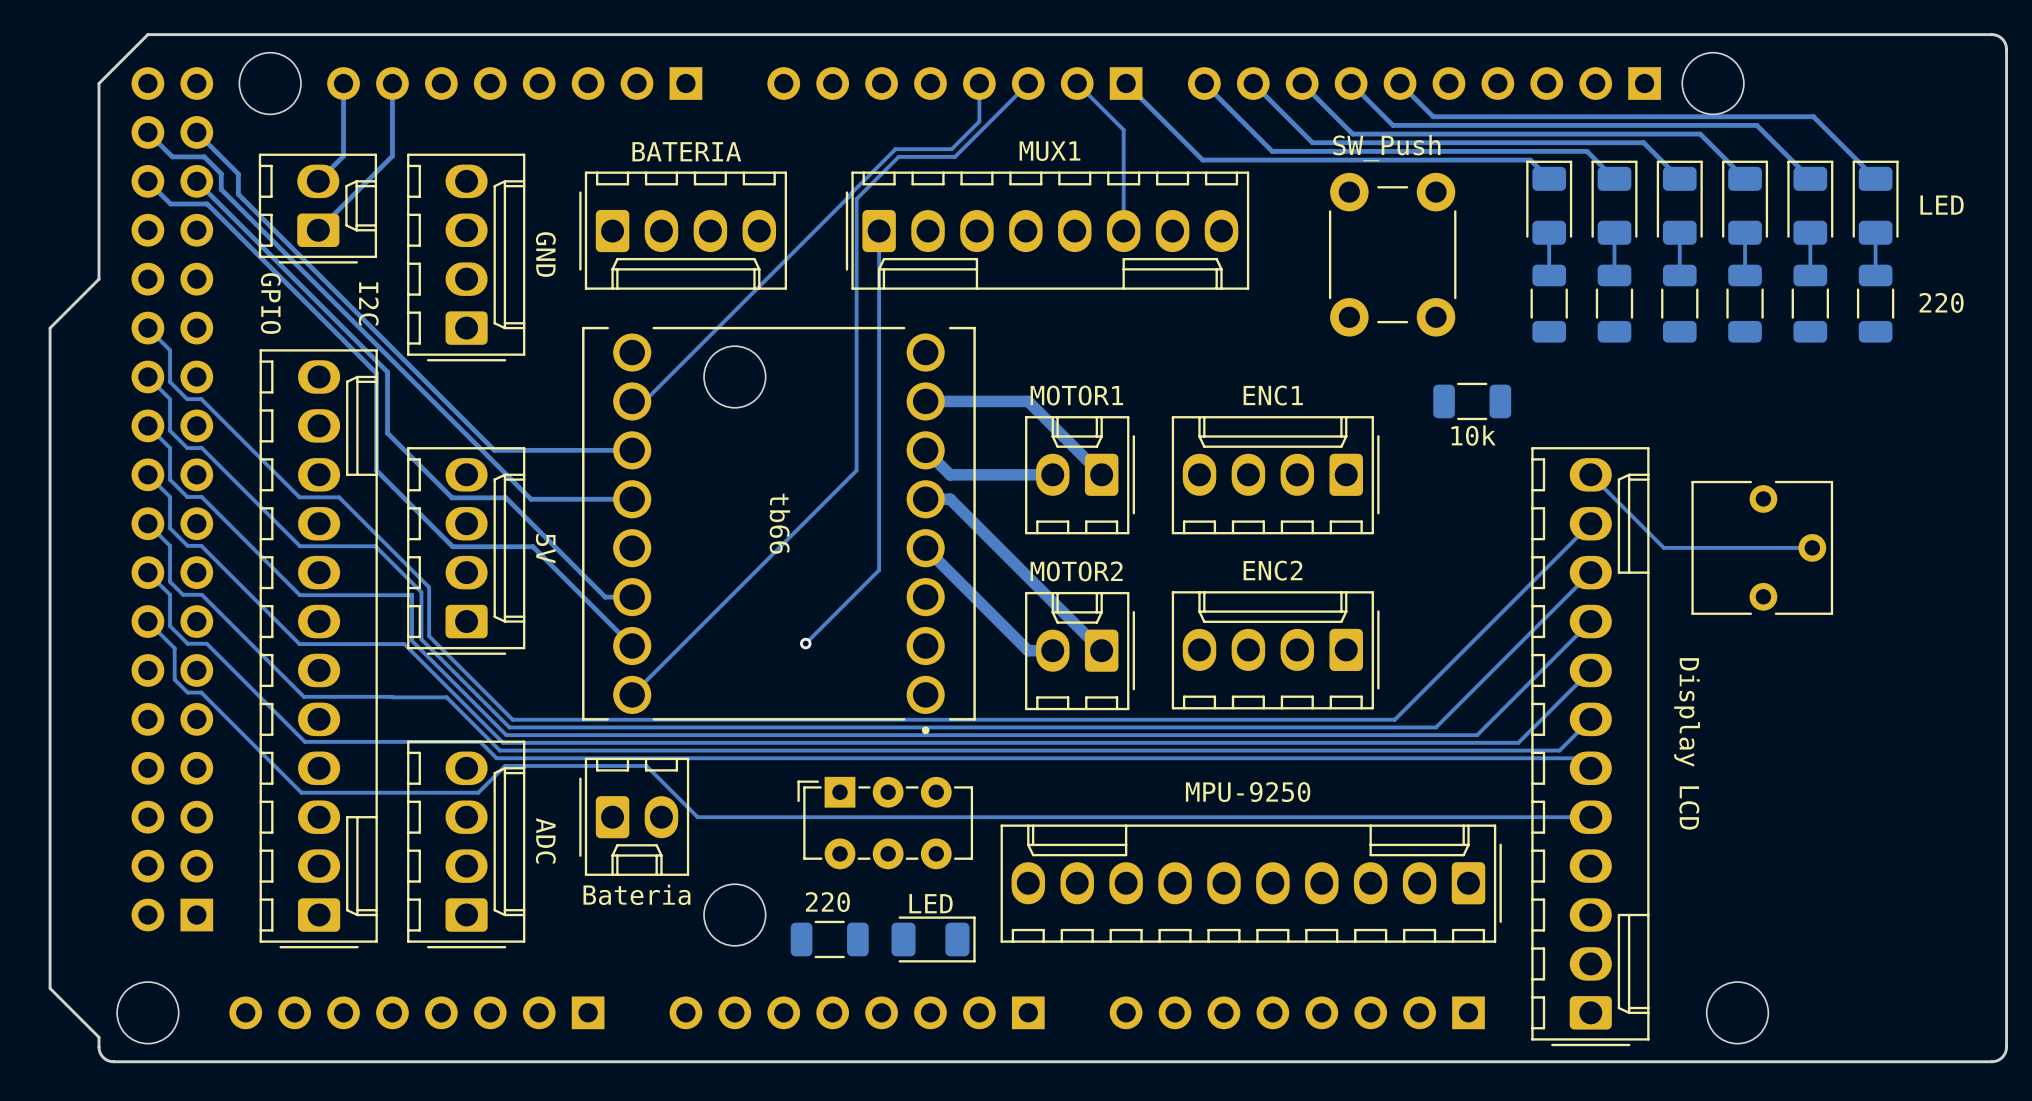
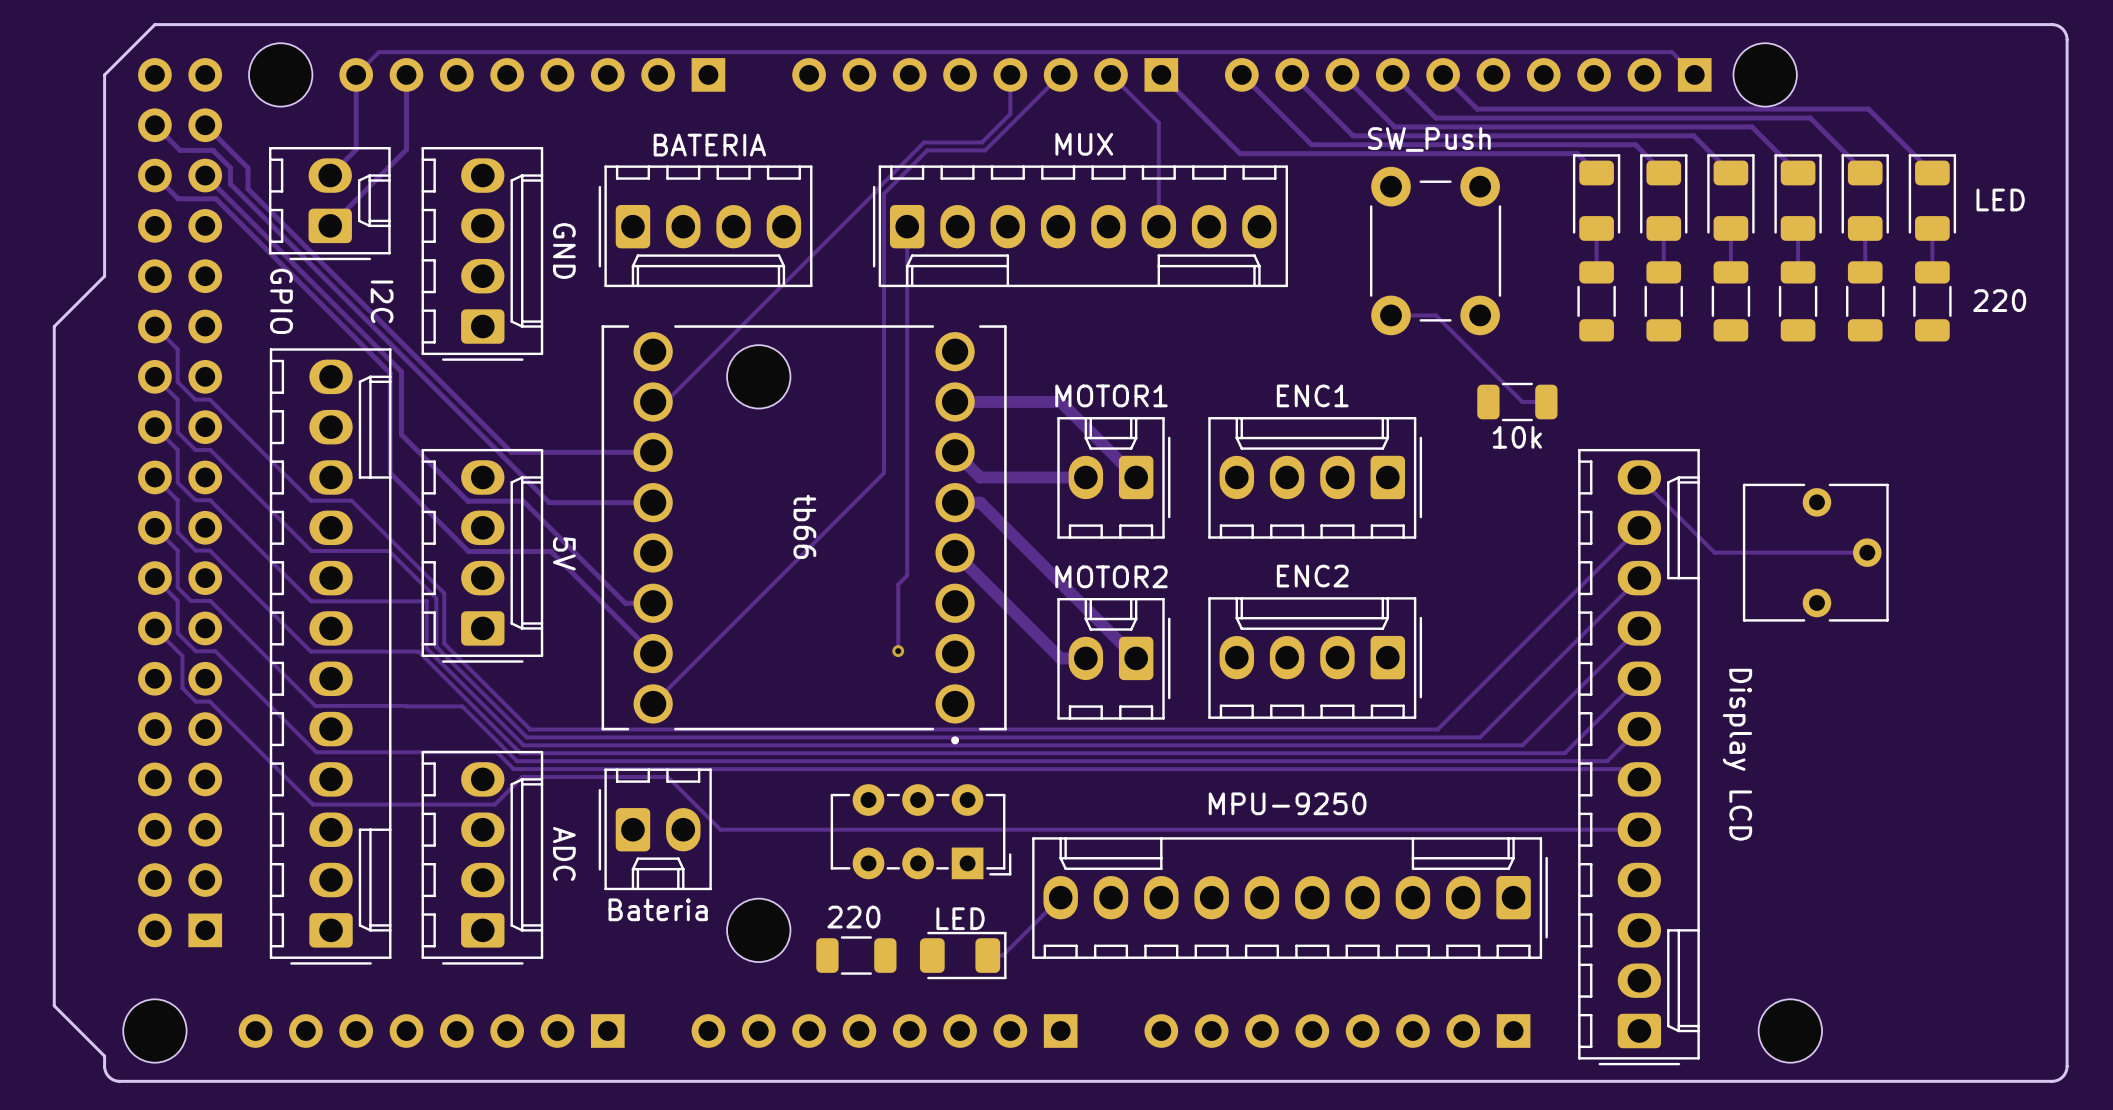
track: none -> (1694, 74) (1671, 52) (378, 52) (356, 74)
MUX1 name: MUX1 (1049, 151) -> MUX (1084, 144)
track: none -> (1391, 315) (1435, 315) (1522, 402) (1546, 402)
track: (870, 578) (805, 643) -> (898, 584) (898, 651)
via position: (805, 643) -> (898, 651)
part rotation: 0° (885, 823) -> 180° (921, 831)
track: none -> (1060, 897) (1002, 955) (987, 955)

